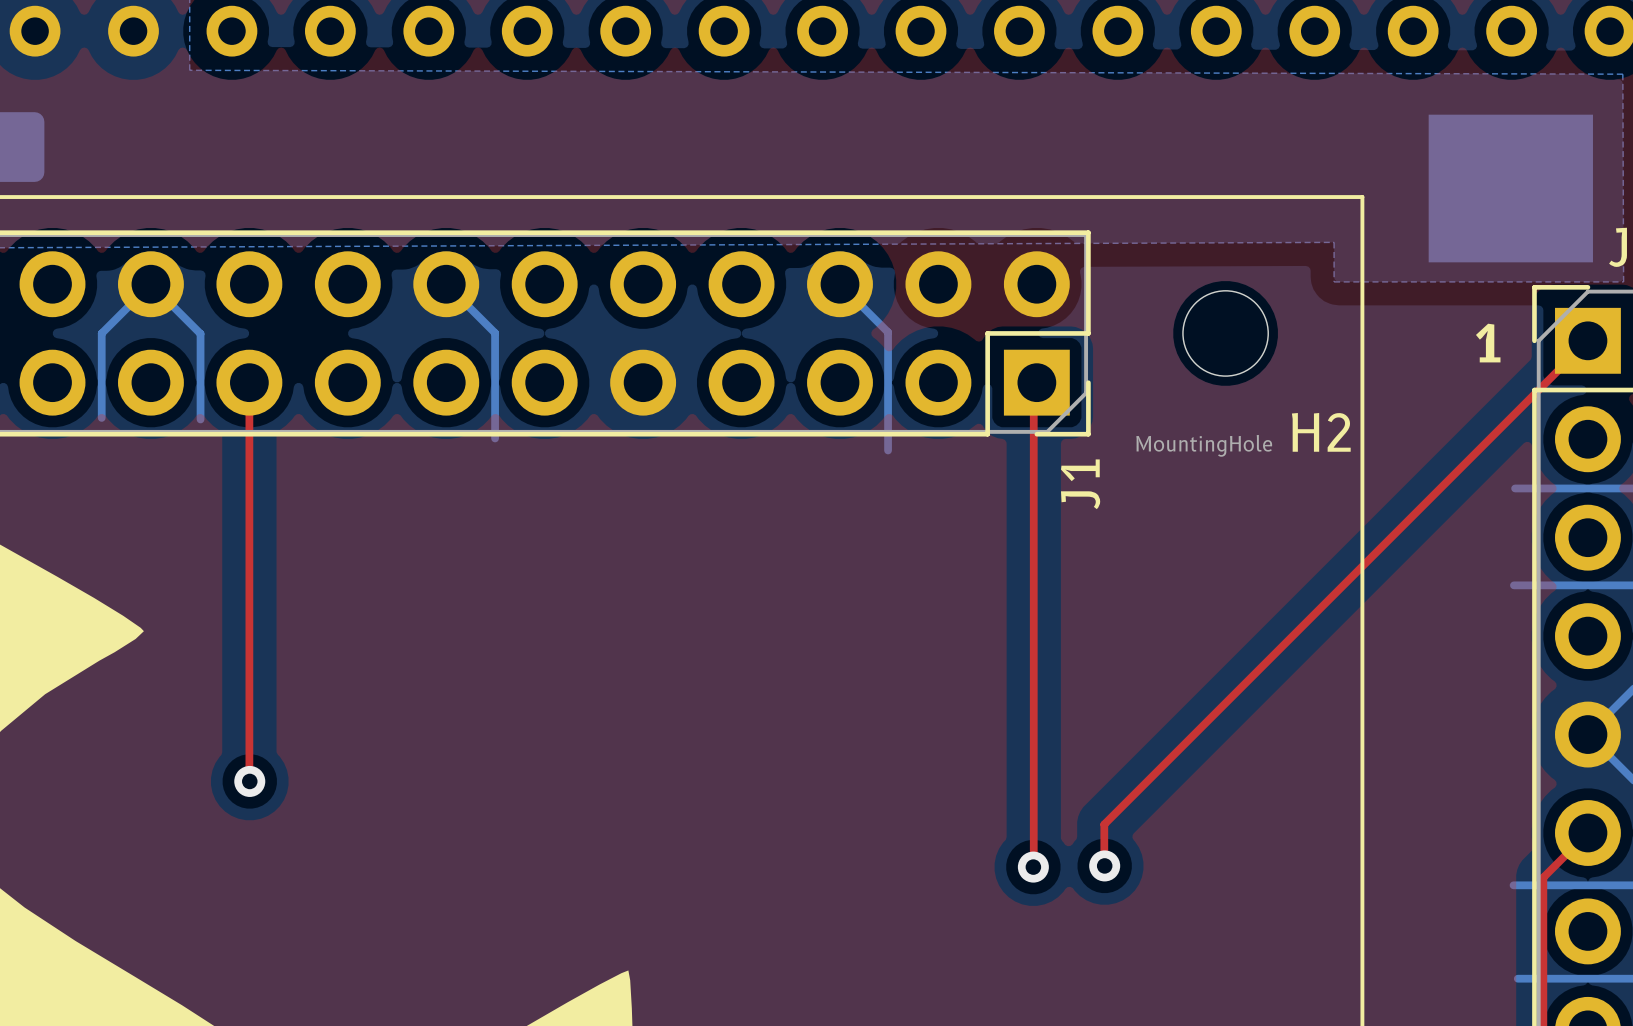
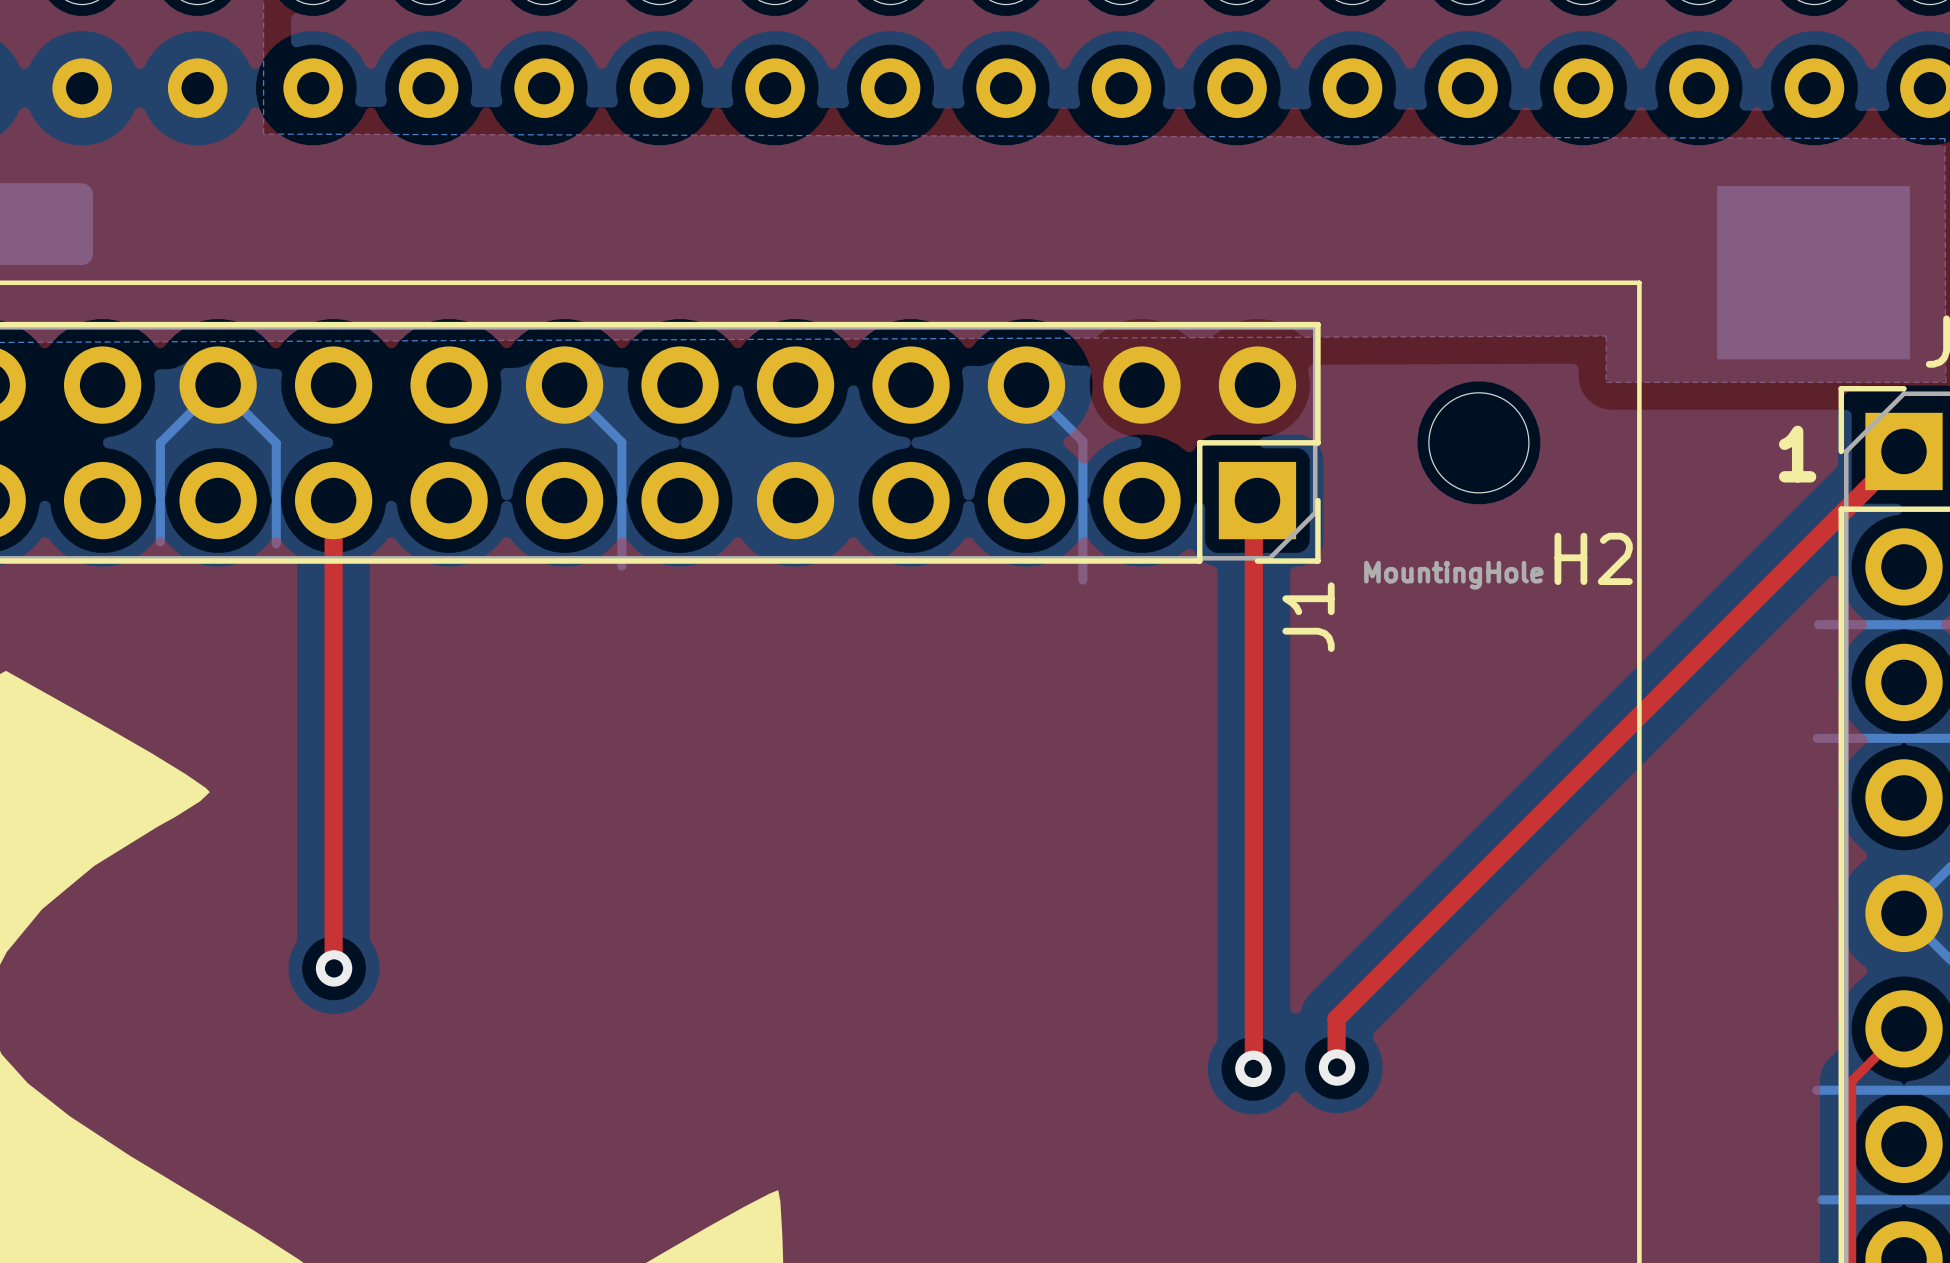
top track width: thin (1587, 340) (1104, 824) (1104, 864) -> thick (1904, 451) (1336, 1018) (1336, 1065)
top track width: thin (249, 382) (249, 781) -> thick (333, 500) (333, 967)
top track width: thin (1033, 385) (1033, 866) -> thick (1253, 504) (1253, 1067)

